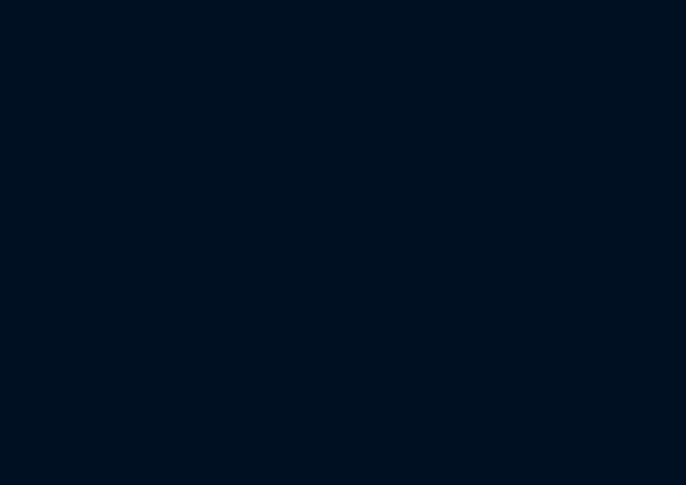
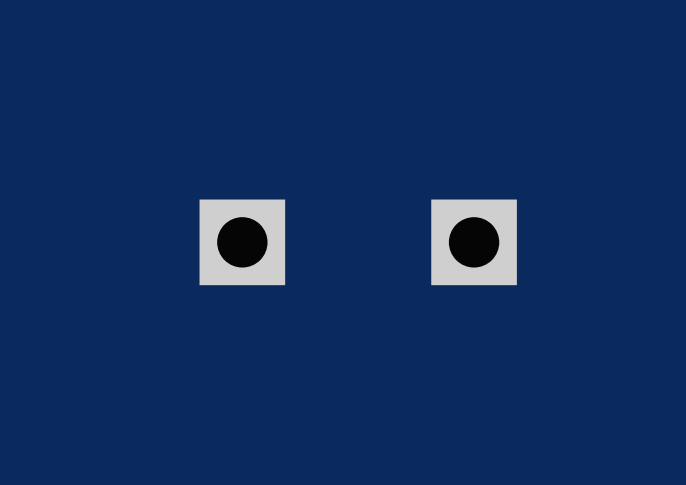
part: none -> (242, 242)
part: none -> (474, 242)

